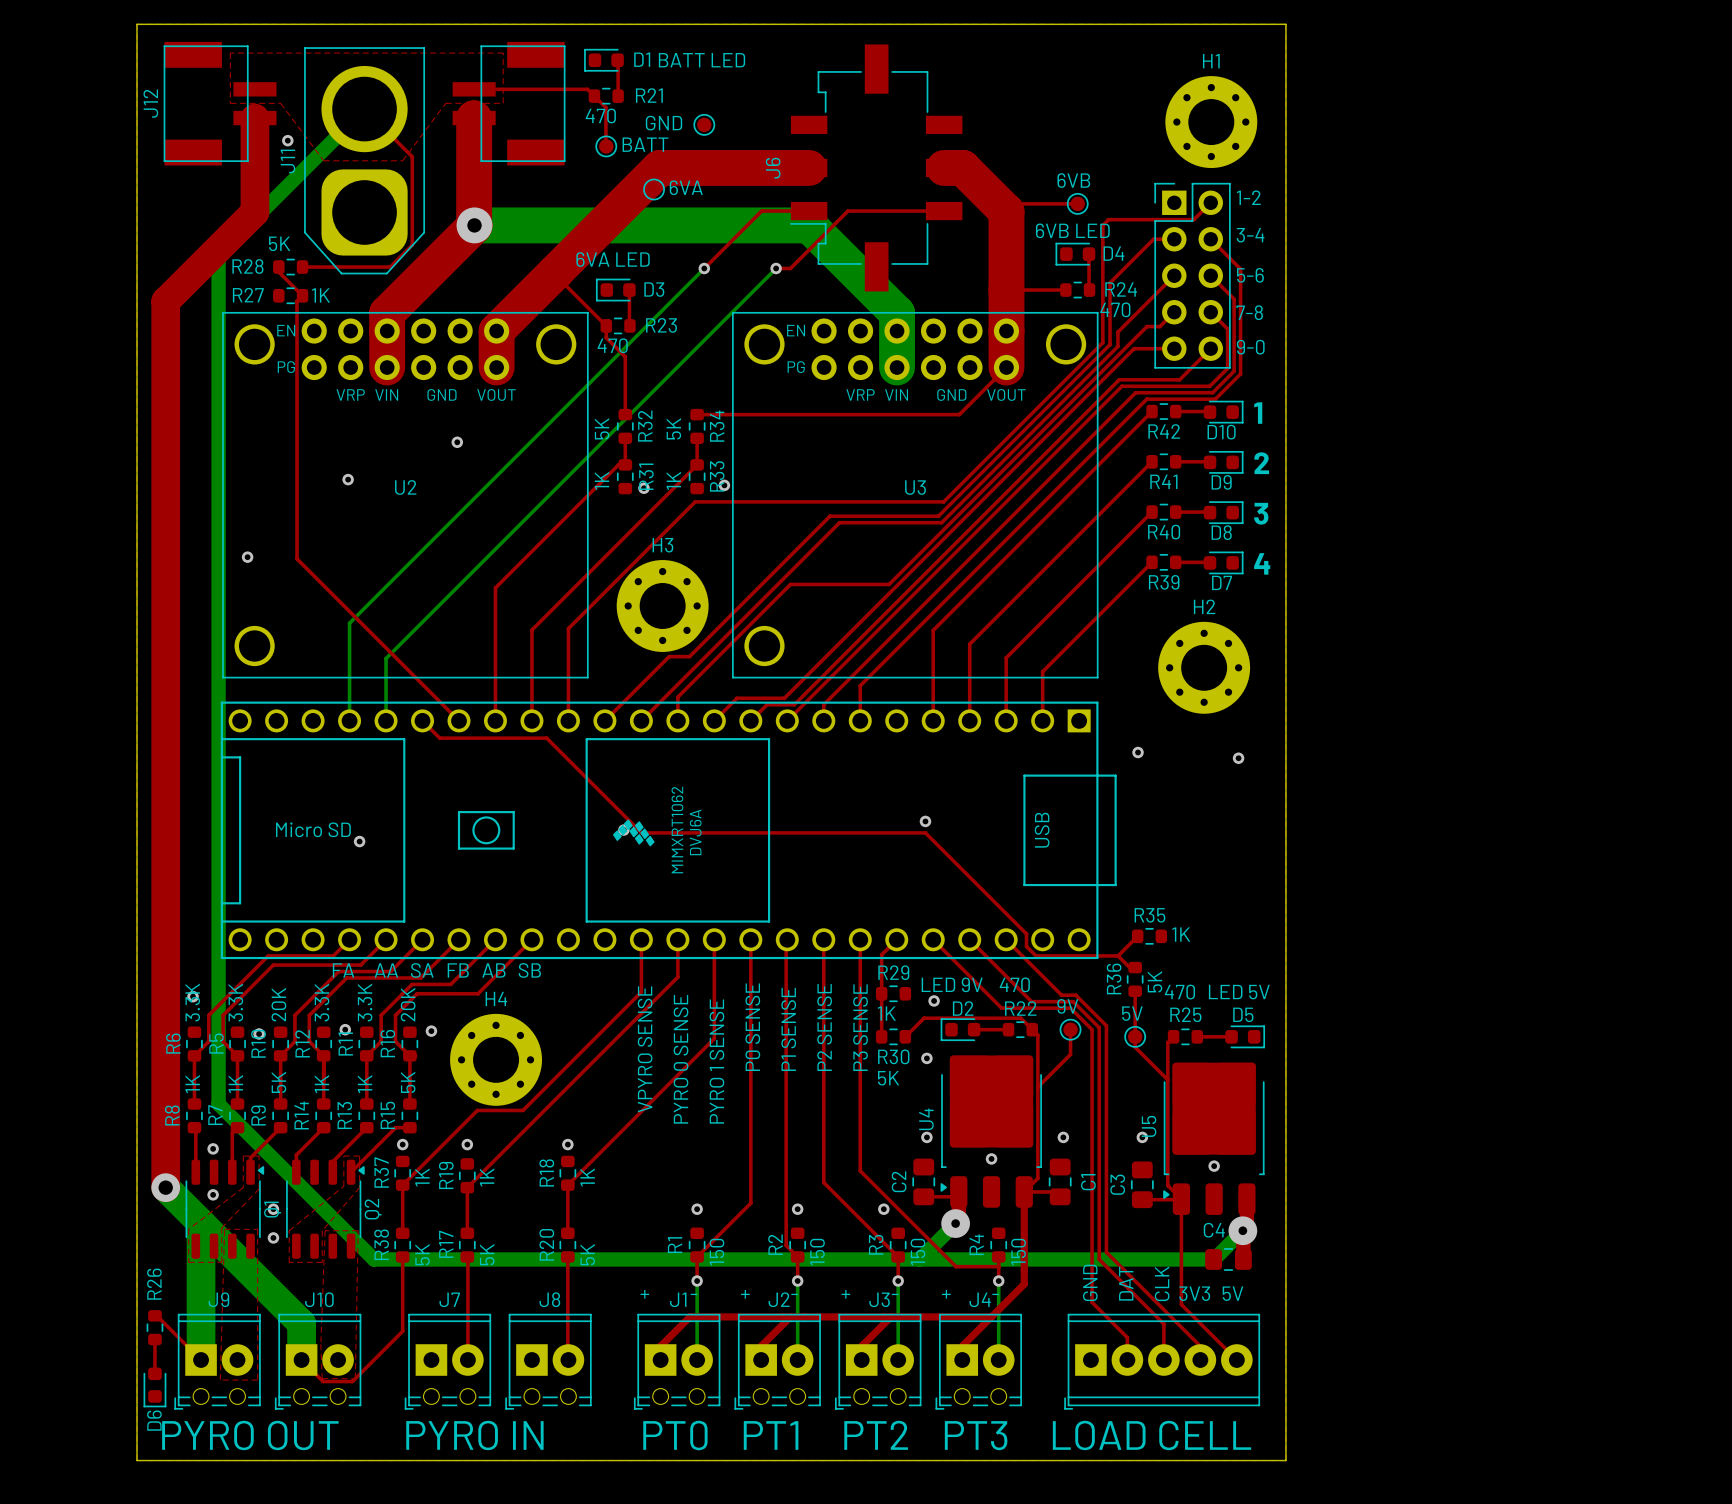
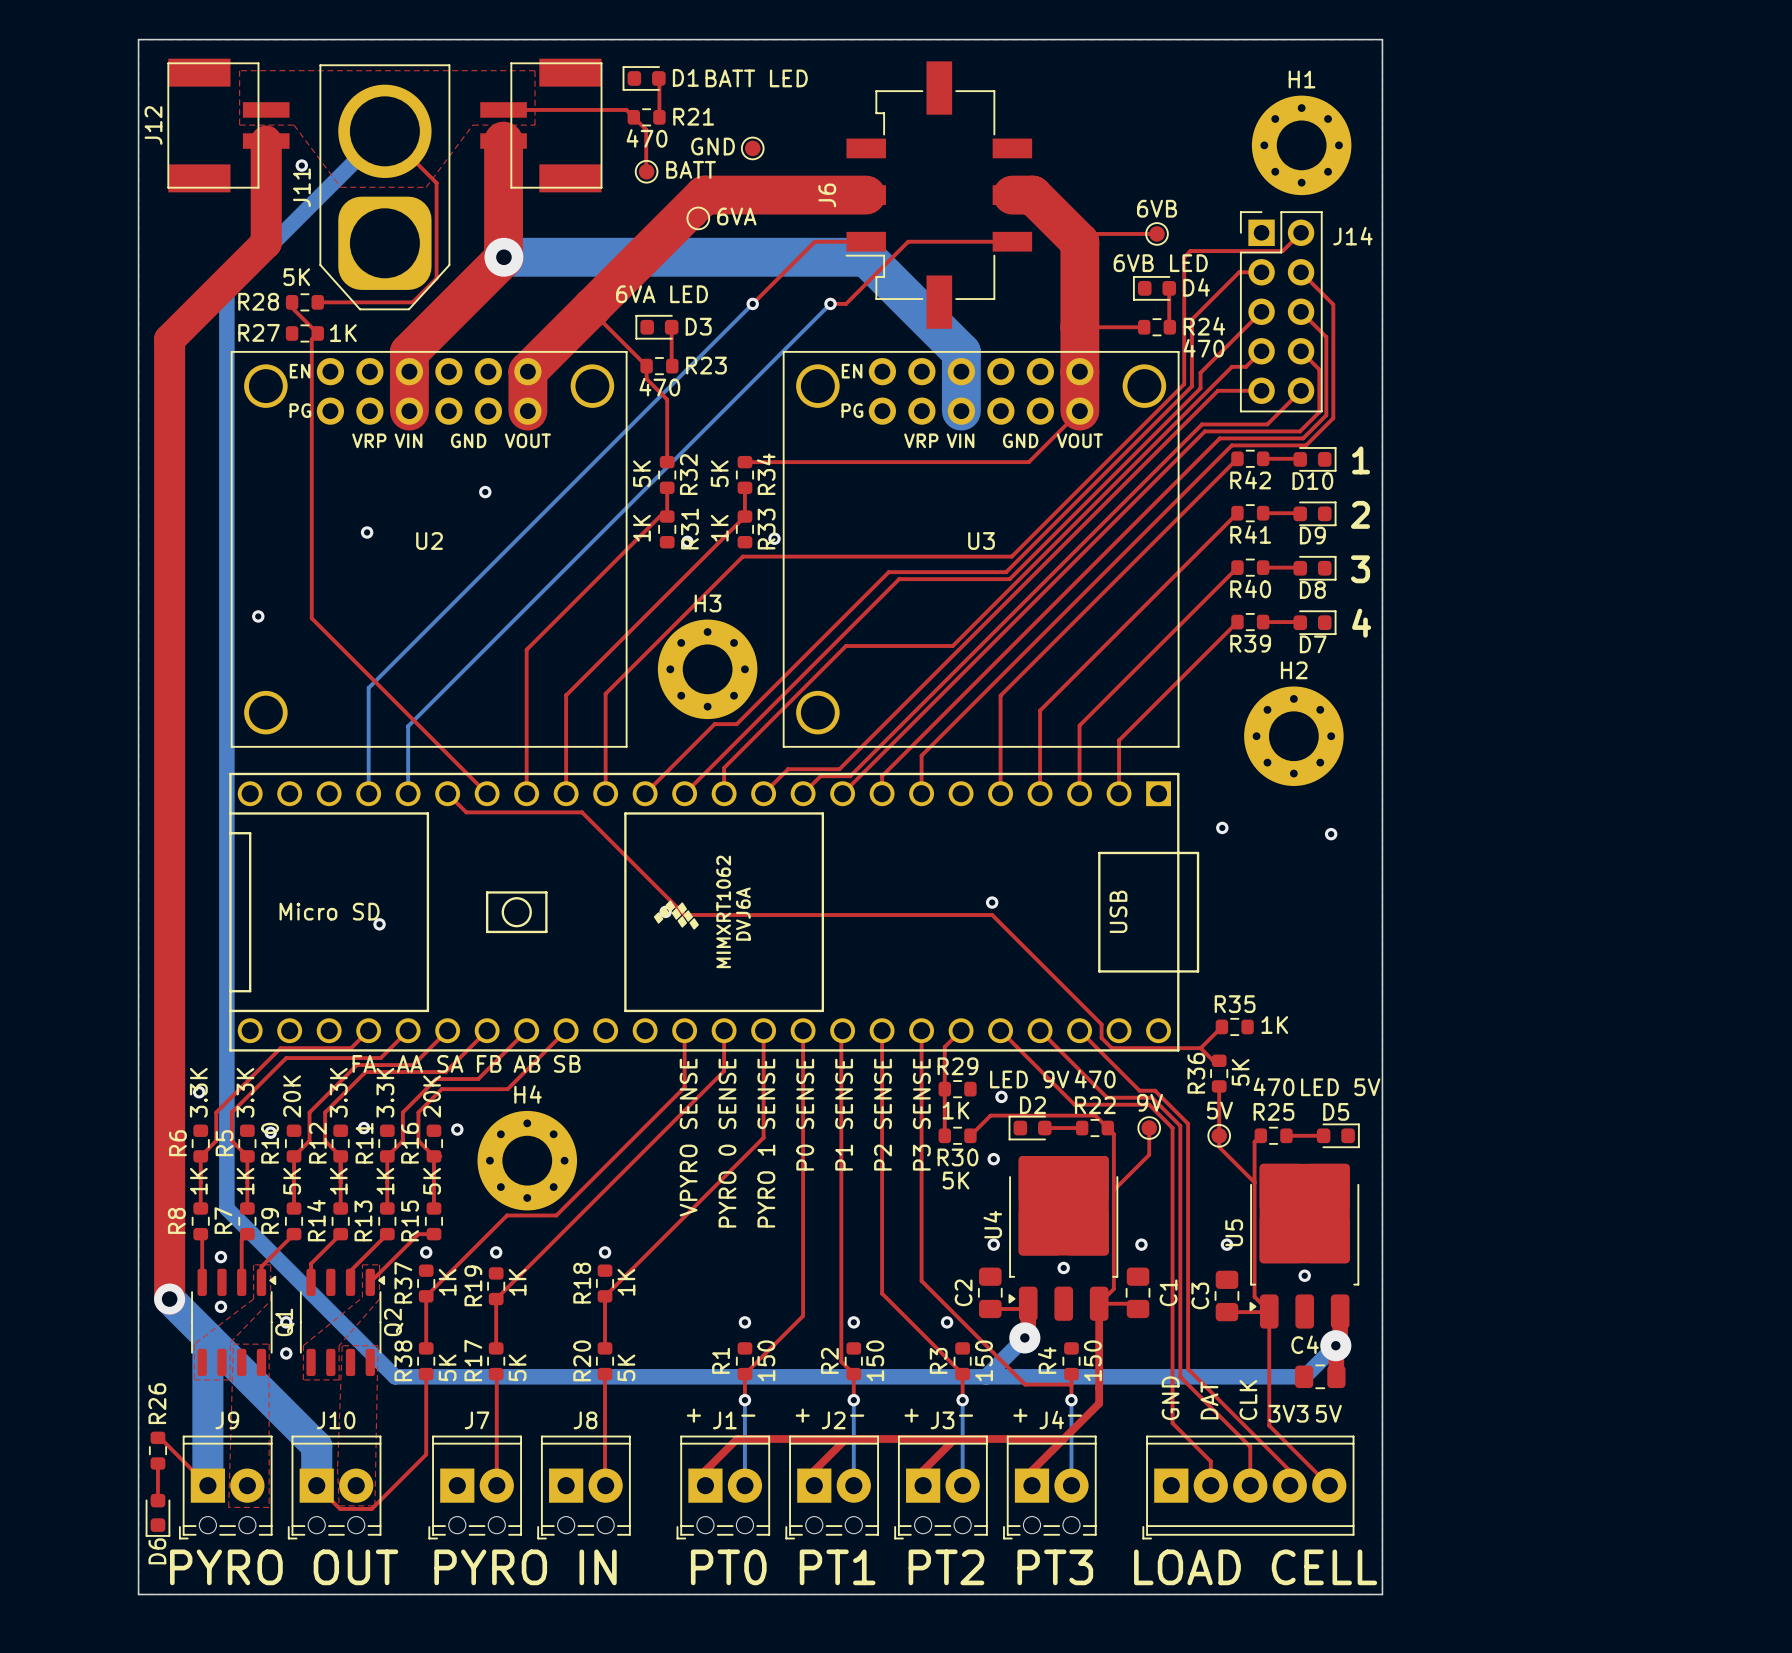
text: 1-2 (1248, 197) -> none
J14 name: none -> J14 (1352, 236)
text: 3-4 (1250, 235) -> none
text: 5-6 (1250, 275) -> none
text: 7-8 (1249, 312) -> none
text: 9-0 (1250, 347) -> none

